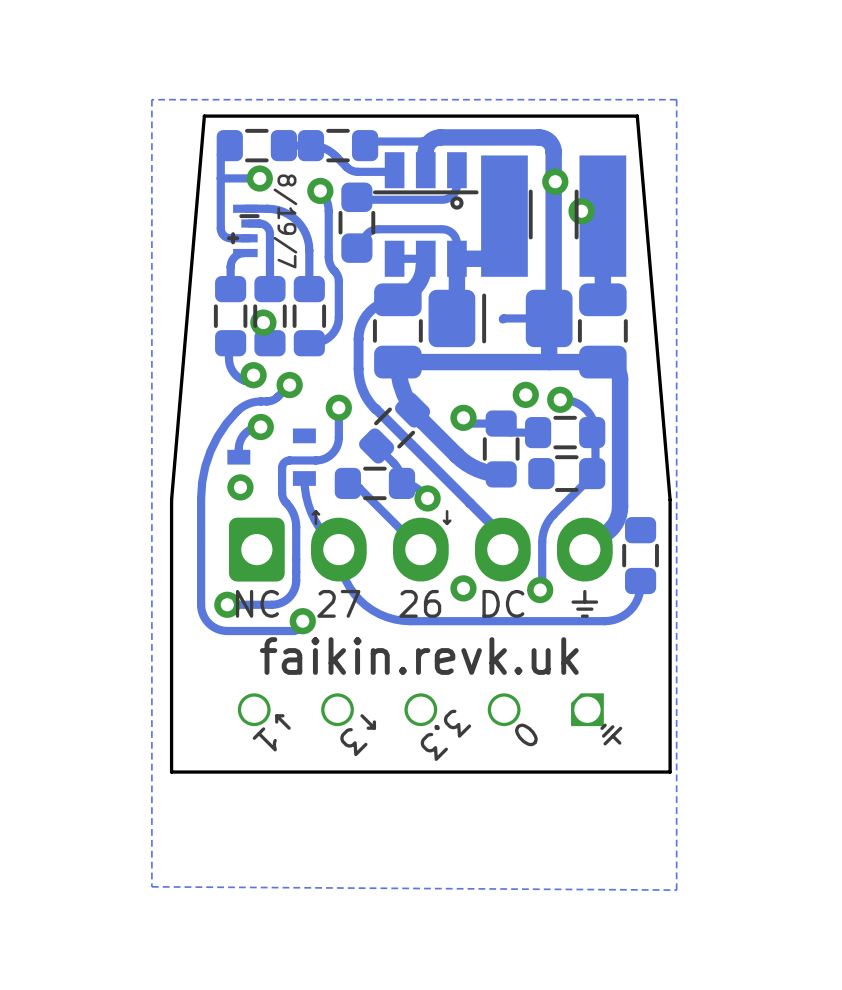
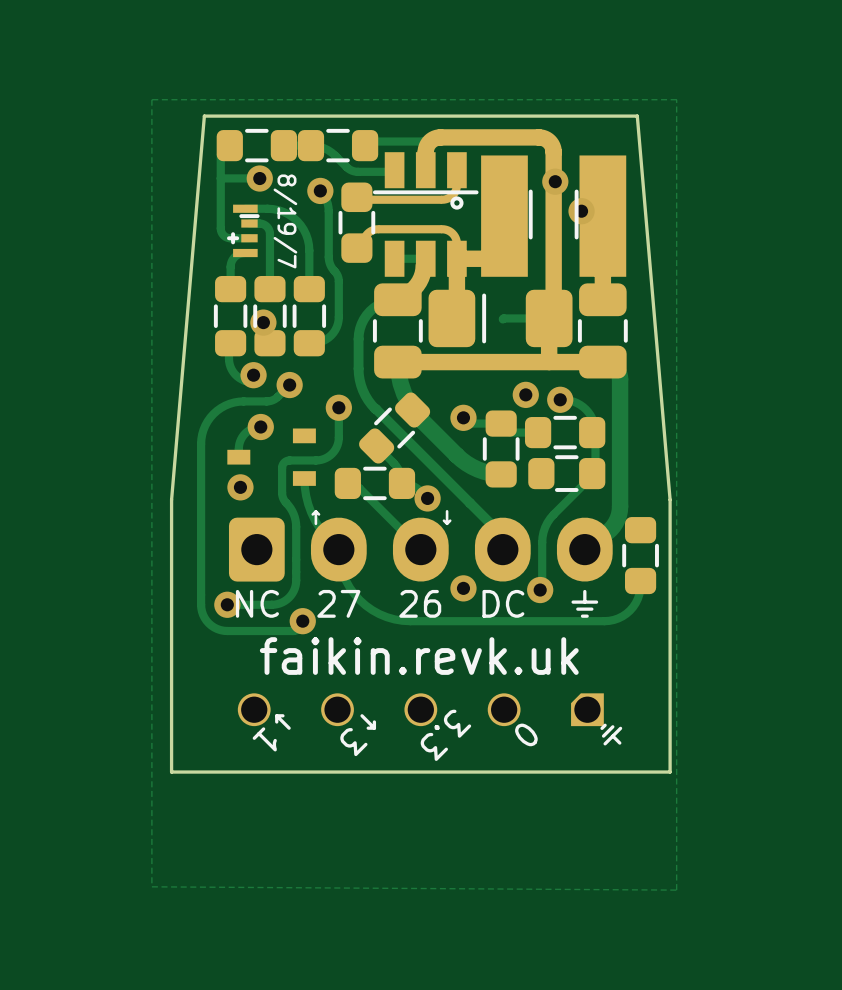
track: (260, 401) (248, 403) (240, 408) (217, 436) (205, 466) (201, 498) -> (260, 401) (229, 403) (217, 410) (207, 421) (201, 439) (201, 498)

